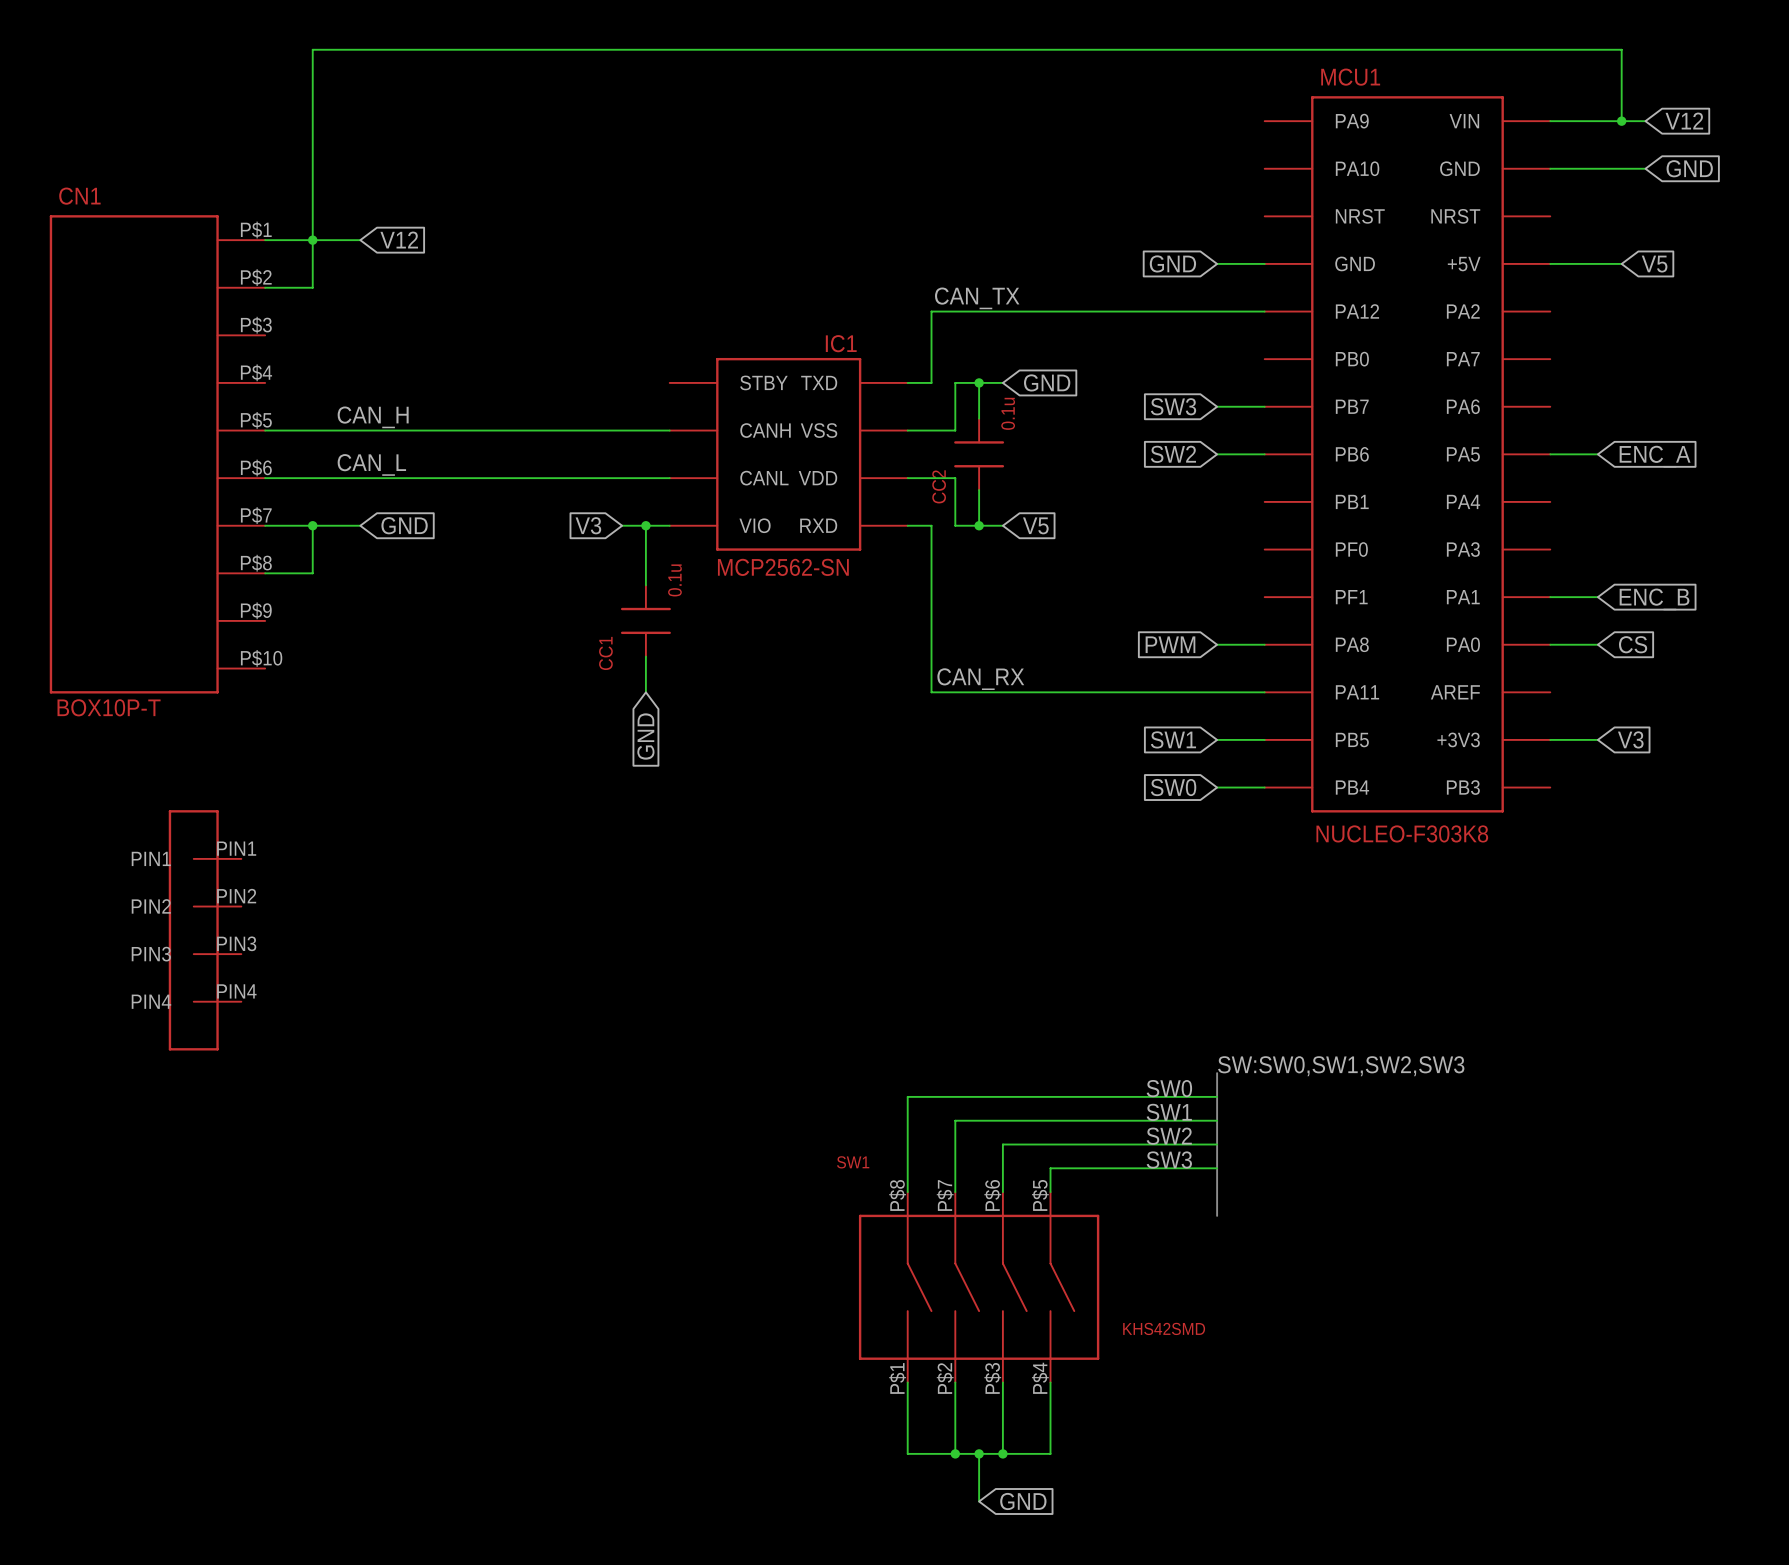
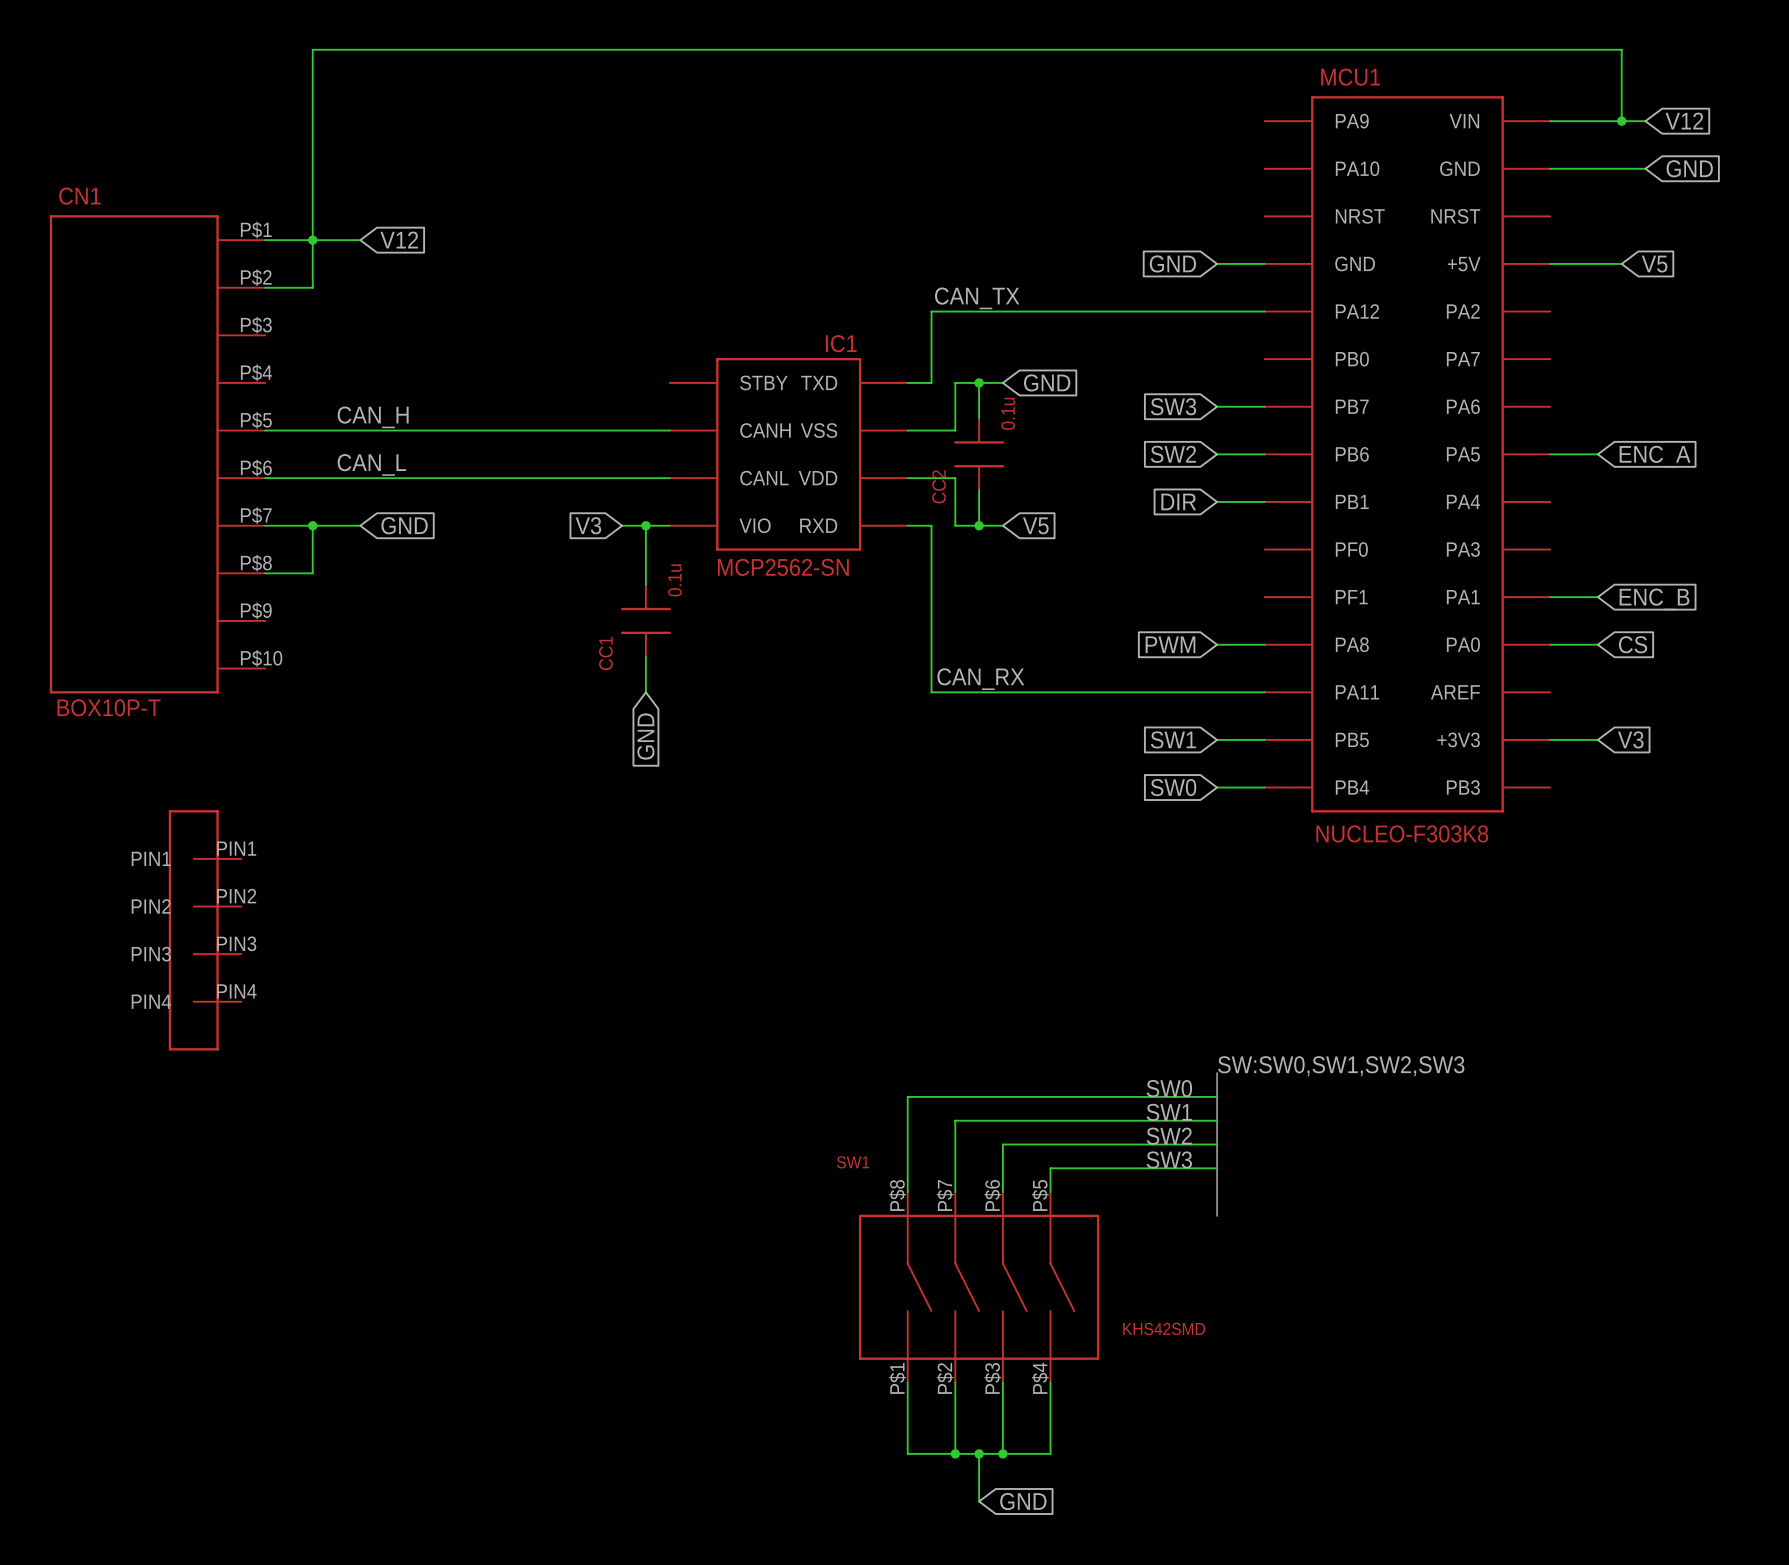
global label: none -> DIR (1178, 501)
wire: none -> (1217, 501) (1264, 501)

